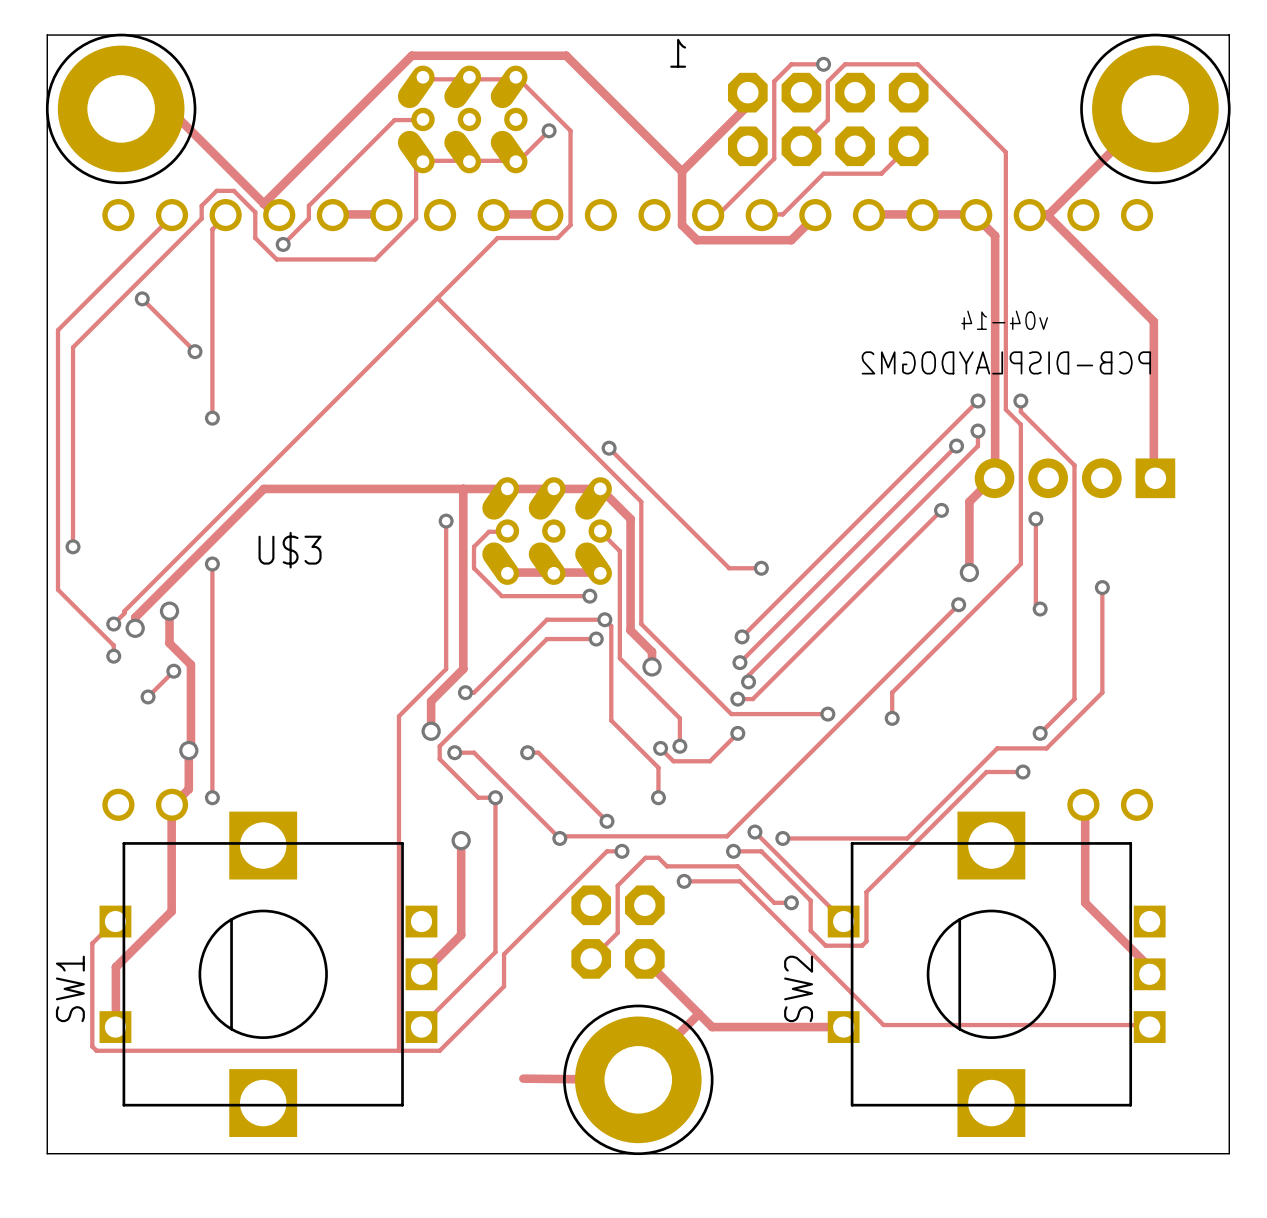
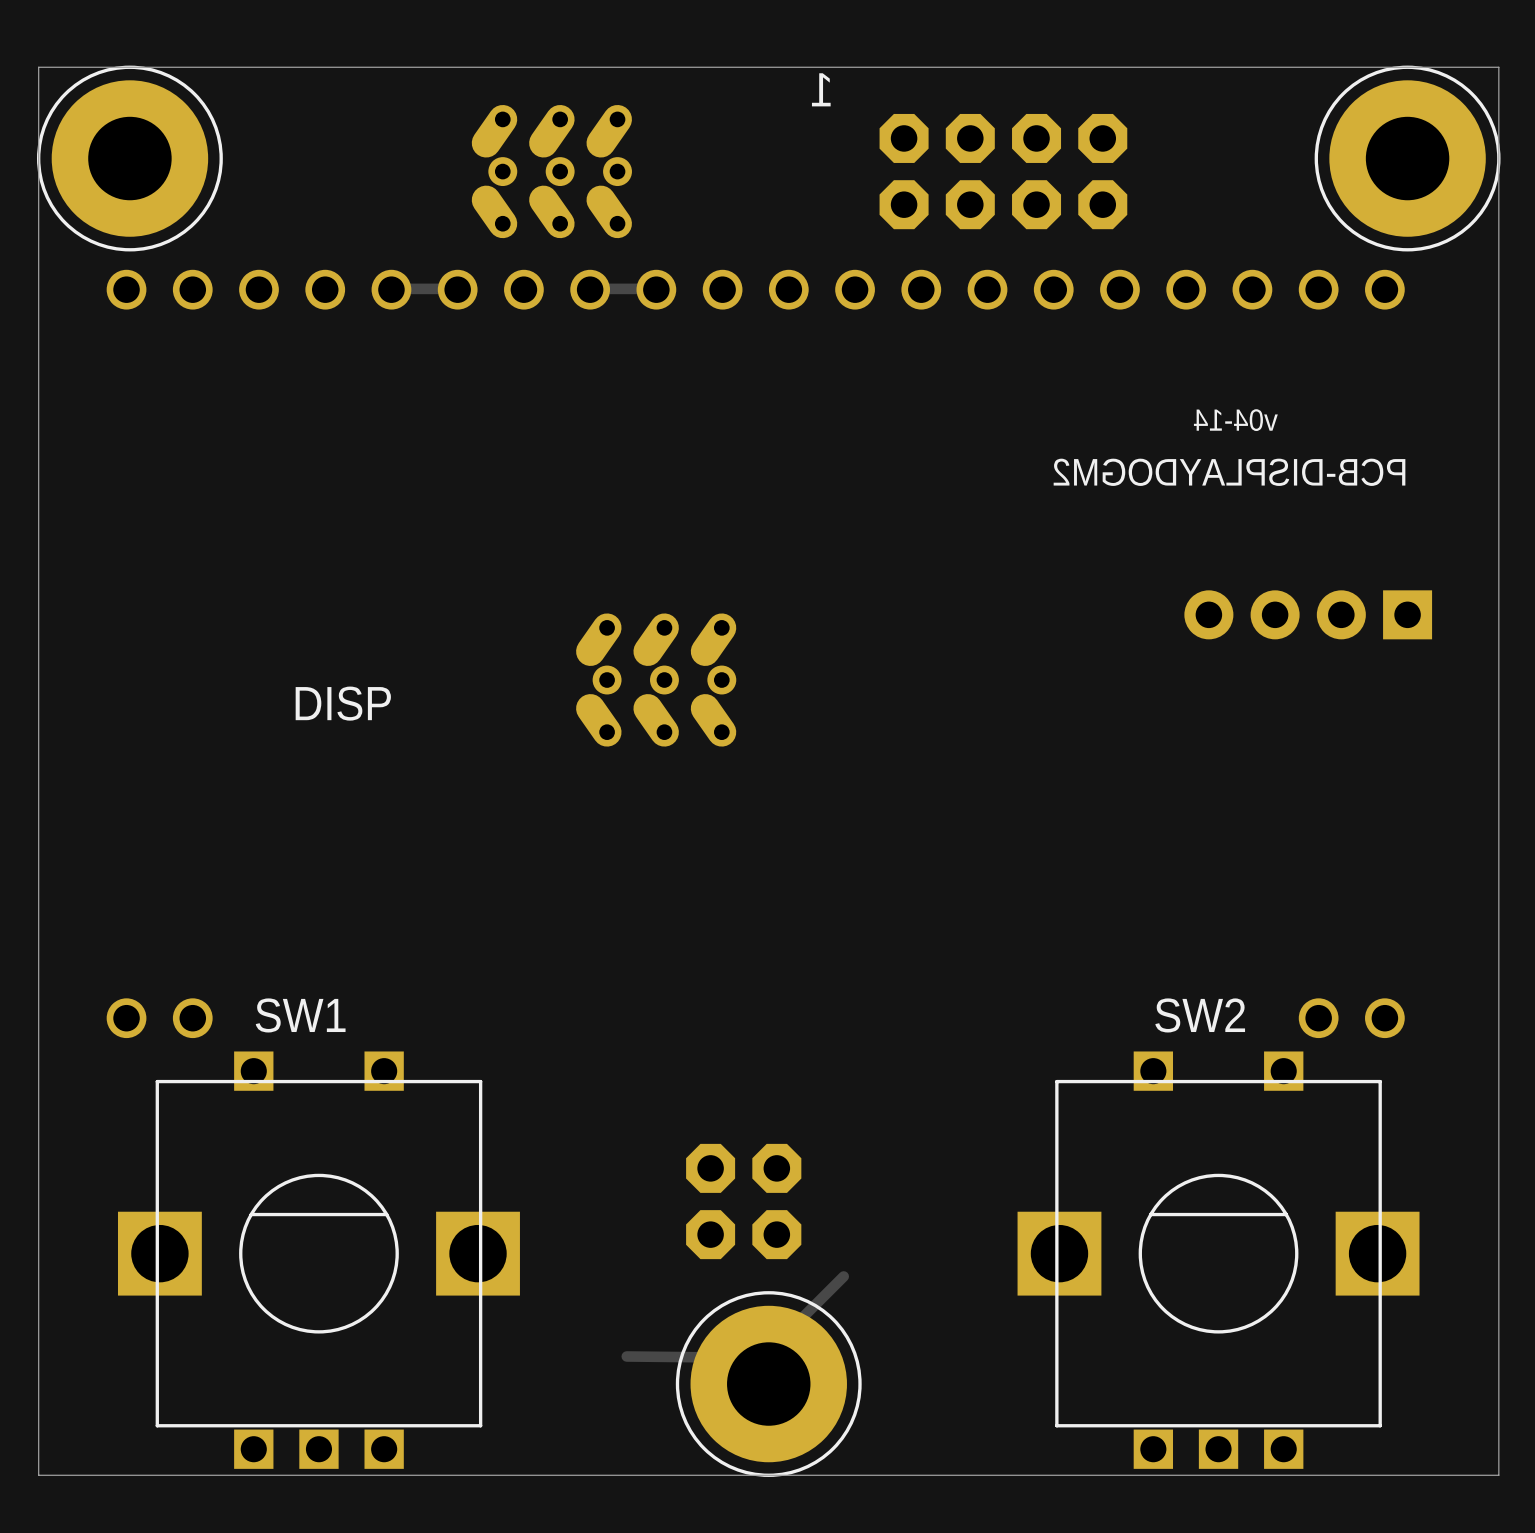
track: (823, 64) (791, 64) (774, 81) (774, 158) (718, 214) (708, 215) -> none
via: (823, 64) -> none
track: (422, 77) (424, 79) (467, 79) (469, 77) (469, 79) (514, 79) (516, 77) (570, 130) (570, 225) (557, 238) (497, 238) (113, 624) -> none
track: (747, 92) (746, 107) (682, 171) -> none
track: (121, 108) (169, 109) (274, 214) (279, 215) -> none
track: (1155, 108) (1048, 214) -> none
track: (422, 119) (394, 120) (308, 205) (308, 218) (283, 244) -> none
track: (549, 130) (516, 162) (514, 160) (422, 161) (416, 169) (416, 218) (375, 259) (276, 259) (255, 238) (255, 212) (233, 190) (216, 190) (201, 205) (201, 218) (73, 347) (73, 546) -> none
via: (549, 130) -> none
track: (801, 146) (827, 120) (827, 81) (845, 64) (917, 64) (1005, 152) (1005, 409) (1020, 424) (1020, 563) (892, 692) (892, 718) -> none
track: (908, 146) (881, 173) (823, 173) (782, 214) (761, 215) -> none
track: (682, 171) (682, 225) (697, 240) (791, 240) (815, 215) -> none
track: (682, 171) (566, 55) (411, 55) (263, 203) -> none
track: (1048, 214) (1048, 216) (1153, 321) (1153, 478) (1155, 478) -> none
track: (172, 215) (58, 330) (58, 589) (113, 645) (113, 656) -> none
track: (225, 215) (212, 229) (212, 418) -> none
track: (868, 215) (975, 214) (995, 235) (995, 478) (969, 501) (969, 572) -> none
via: (283, 244) -> none
track: (142, 298) (195, 351) -> none
via: (142, 298) -> none
track: (437, 298) (641, 501) (641, 624) (731, 714) (827, 714) -> none
via: (195, 351) -> none
track: (977, 401) (742, 636) -> none
via: (977, 401) -> none
track: (1020, 401) (1020, 411) (1074, 465) (1074, 699) (1040, 733) -> none
via: (1020, 401) -> none
via: (212, 418) -> none
track: (977, 431) (977, 446) (748, 675) (748, 681) -> none
via: (977, 431) -> none
track: (956, 446) (739, 662) -> none
via: (956, 446) -> none
track: (609, 448) (729, 568) (761, 568) -> none
via: (609, 448) -> none
track: (463, 488) (463, 669) (431, 701) (431, 731) -> none
track: (600, 488) (263, 488) (135, 617) (135, 628) -> none
track: (600, 488) (630, 518) (630, 630) (652, 651) (652, 666) -> none
track: (941, 510) (752, 699) (737, 699) -> none
via: (941, 510) -> none
track: (1035, 518) (1035, 604) (1040, 609) -> none
via: (1035, 518) -> none
track: (446, 521) (446, 669) (398, 716) (398, 1050) -> none
via: (446, 521) -> none
track: (507, 531) (489, 531) (474, 546) (474, 568) (501, 596) (589, 596) -> none
track: (600, 531) (619, 551) (619, 658) (679, 718) (679, 746) -> none
via: (73, 546) -> none
U$3 name: U$3 (290, 550) -> DISP (343, 703)
track: (212, 563) (212, 797) -> none
via: (212, 563) -> none
via: (761, 568) -> none
via: (969, 572) -> none
track: (507, 573) (600, 573) -> none
track: (1102, 587) (1102, 692) (1046, 748) (997, 748) (907, 838) (782, 838) -> none
via: (1102, 587) -> none
via: (589, 596) -> none
track: (958, 604) (727, 836) (559, 836) (559, 838) (474, 752) (454, 752) -> none
via: (958, 604) -> none
via: (1040, 609) -> none
track: (169, 611) (169, 643) (190, 664) (188, 789) (172, 804) (171, 911) (115, 967) (115, 1027) -> none
via: (169, 611) -> none
via: (604, 619) -> none
via: (113, 624) -> none
via: (135, 628) -> none
via: (742, 636) -> none
track: (596, 639) (546, 639) (439, 746) (439, 759) (478, 797) (495, 797) (495, 952) (421, 1027) -> none
via: (596, 639) -> none
via: (113, 656) -> none
via: (739, 662) -> none
via: (652, 666) -> none
track: (173, 671) (148, 696) -> none
via: (173, 671) -> none
via: (748, 681) -> none
track: (465, 692) (474, 692) (546, 619) (604, 619) (611, 626) (611, 720) (658, 767) (658, 797) -> none
via: (465, 692) -> none
via: (148, 696) -> none
via: (737, 699) -> none
via: (827, 714) -> none
via: (892, 718) -> none
via: (431, 731) -> none
track: (737, 733) (709, 761) (673, 761) (660, 748) -> none
via: (737, 733) -> none
via: (1040, 733) -> none
via: (679, 746) -> none
via: (660, 748) -> none
via: (188, 750) -> none
via: (454, 752) -> none
track: (527, 752) (538, 752) (606, 821) -> none
via: (527, 752) -> none
track: (1023, 772) (986, 772) (866, 892) (866, 941) (862, 945) (825, 945) (810, 930) (810, 900) (761, 851) (733, 851) -> none
via: (1023, 772) -> none
via: (212, 797) -> none
via: (495, 797) -> none
via: (658, 797) -> none
track: (1083, 804) (1085, 806) (1085, 902) (1149, 967) (1149, 974) -> none
via: (606, 821) -> none
track: (754, 832) (843, 921) -> none
via: (754, 832) -> none
via: (559, 838) -> none
via: (782, 838) -> none
track: (461, 840) (461, 934) (421, 974) -> none
via: (461, 840) -> none
track: (621, 851) (606, 851) (504, 954) (504, 986) (439, 1050) (96, 1050) (92, 1046) (92, 943) (115, 921) -> none
via: (621, 851) -> none
via: (733, 851) -> none
track: (684, 881) (739, 881) (883, 1025) (1149, 1025) (1149, 1027) -> none
via: (684, 881) -> none
track: (791, 902) (774, 902) (737, 866) (667, 866) (658, 857) (645, 857) (617, 885) (617, 932) (591, 958) -> none
via: (791, 902) -> none
part position: (618, 932) -> (743, 1201)
track: (641, 960) (644, 958) (712, 1027) (843, 1027) -> none
SW1 rotation: 0° (268, 974) -> 90° clockwise (318, 1260)
SW2 rotation: 0° (996, 974) -> 90° clockwise (1218, 1260)
part position: (638, 1079) -> (768, 1384)
board edge: (47, 1153) (1229, 1153) -> (38, 1449) (38, 1475) (1498, 1475) (1498, 1449)

